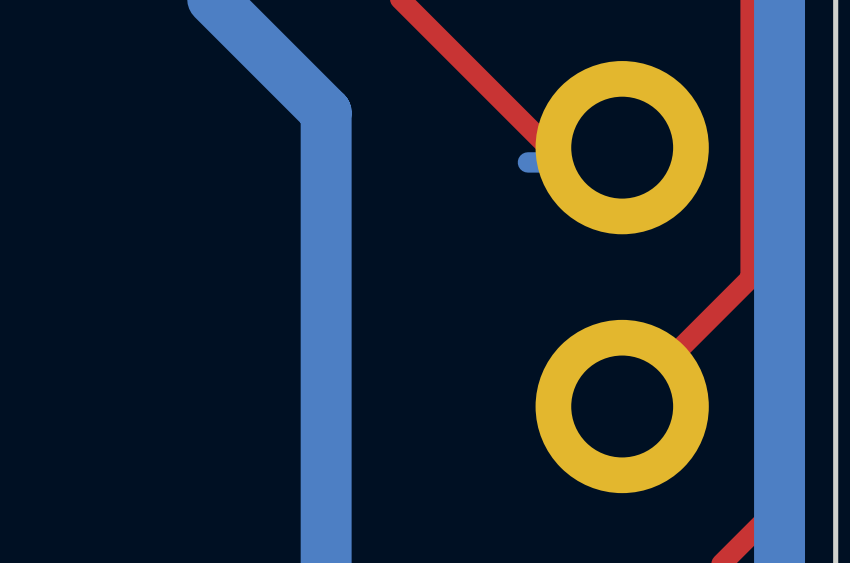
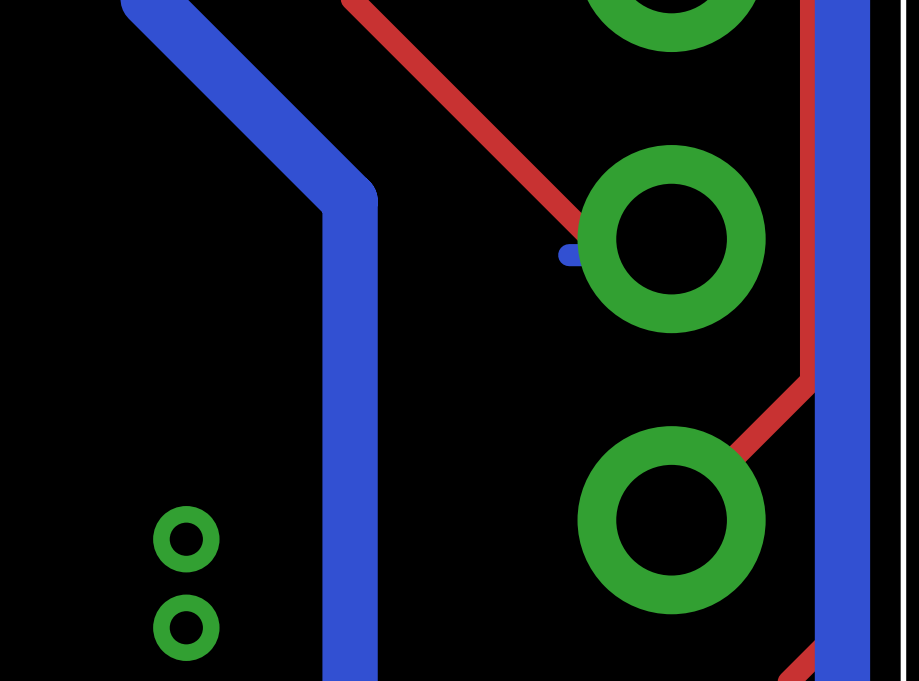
via: none -> (186, 539)
via: none -> (186, 627)

